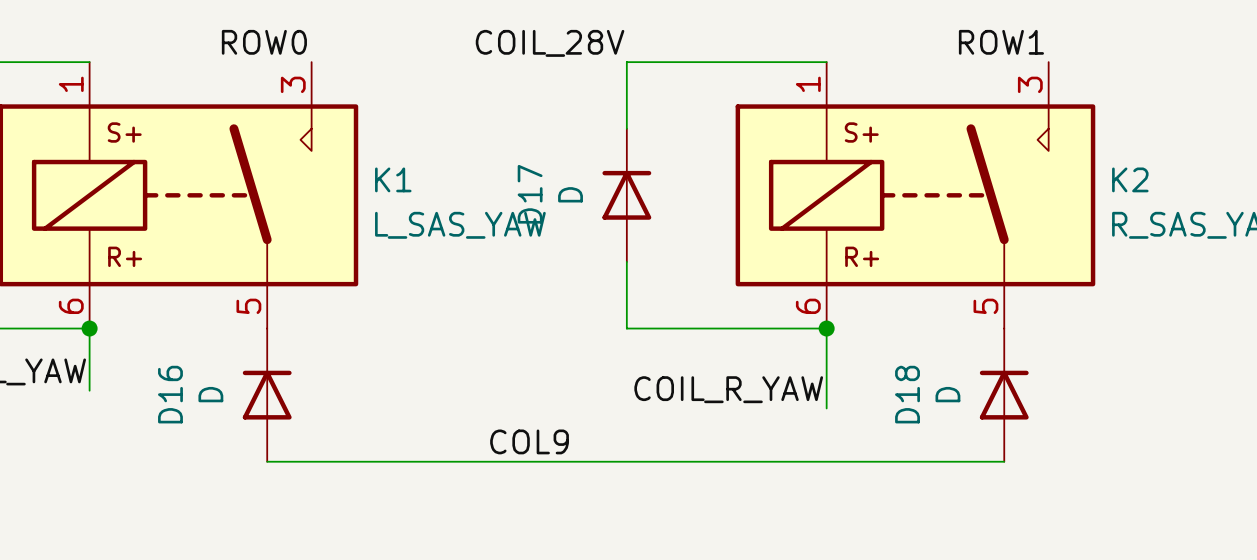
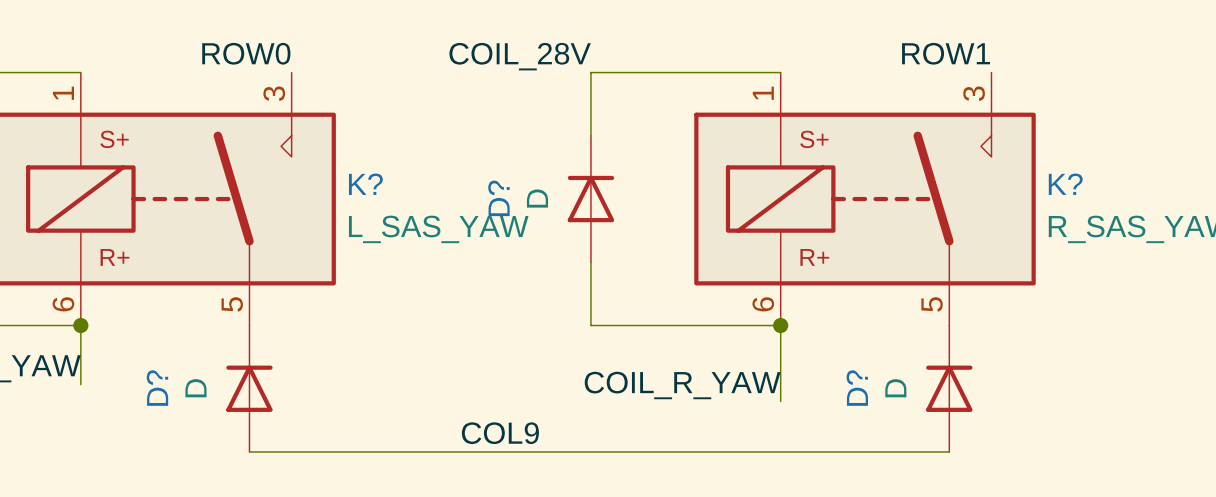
K1 name: K1 (393, 179) -> K? (365, 184)
K2 name: K2 (1130, 179) -> K? (1065, 184)
D17 name: D17 (530, 194) -> D? (498, 198)
D16 name: D16 (170, 394) -> D? (157, 388)
D18 name: D18 (907, 394) -> D? (857, 388)

